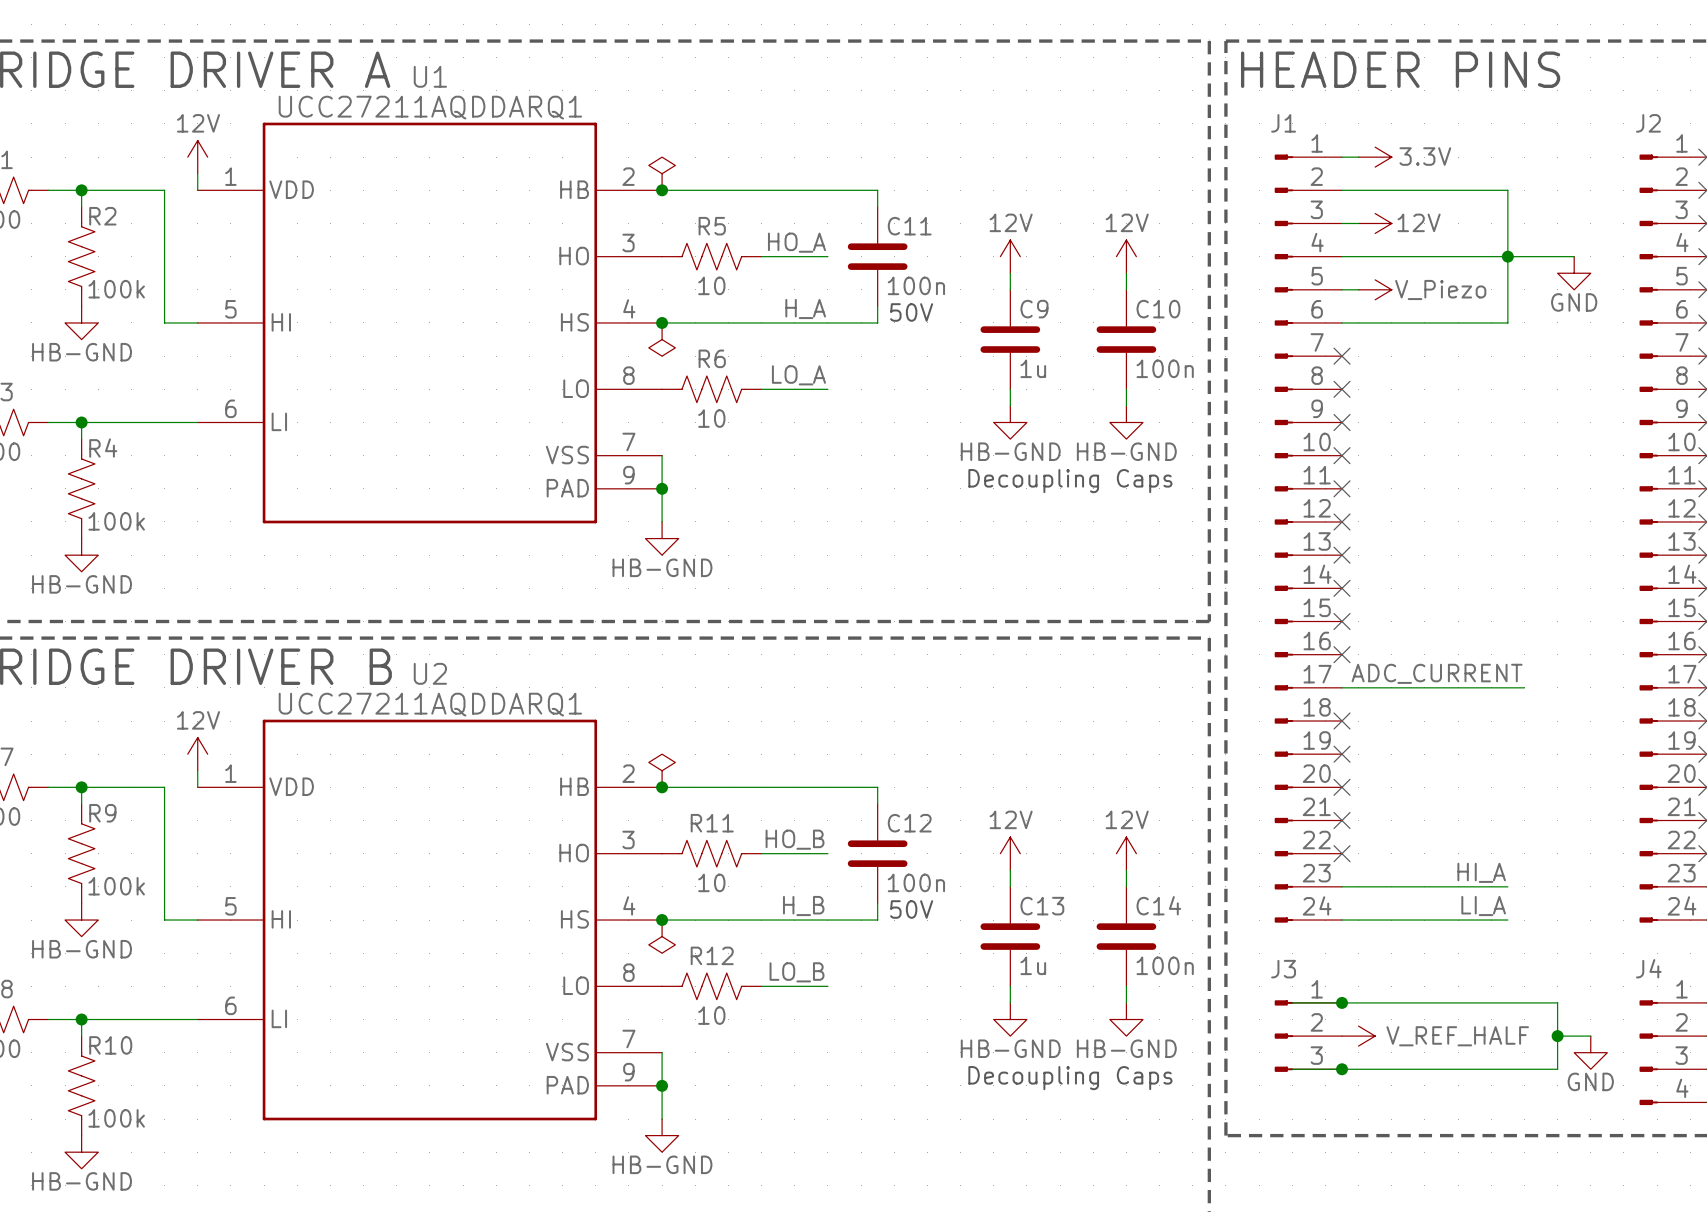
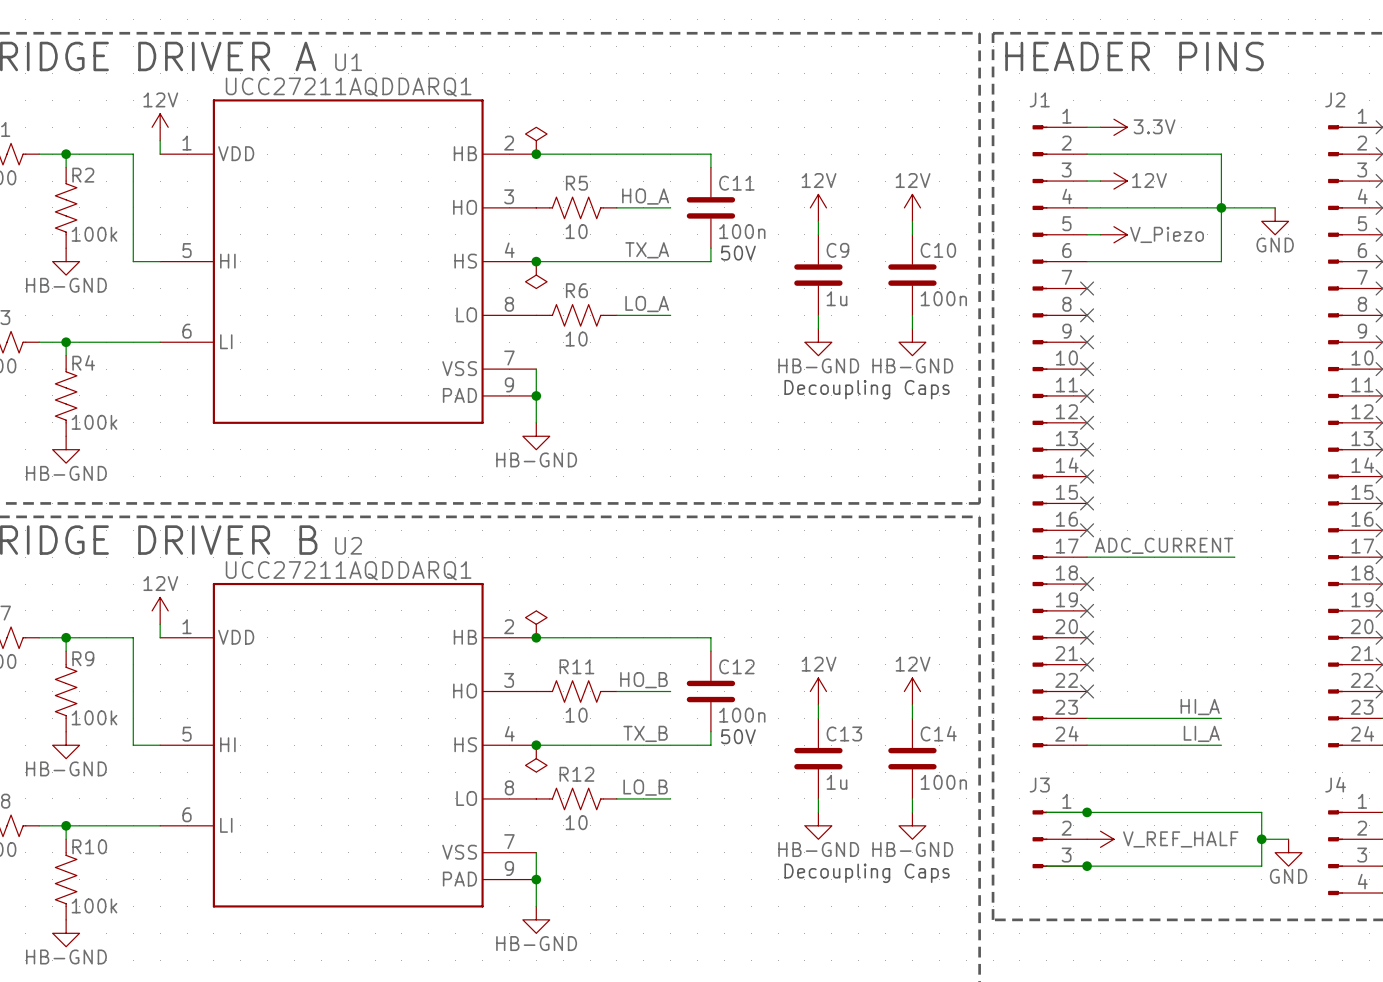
label: H_A (805, 308) -> TX_A (647, 250)
label: H_B (803, 906) -> TX_B (645, 733)

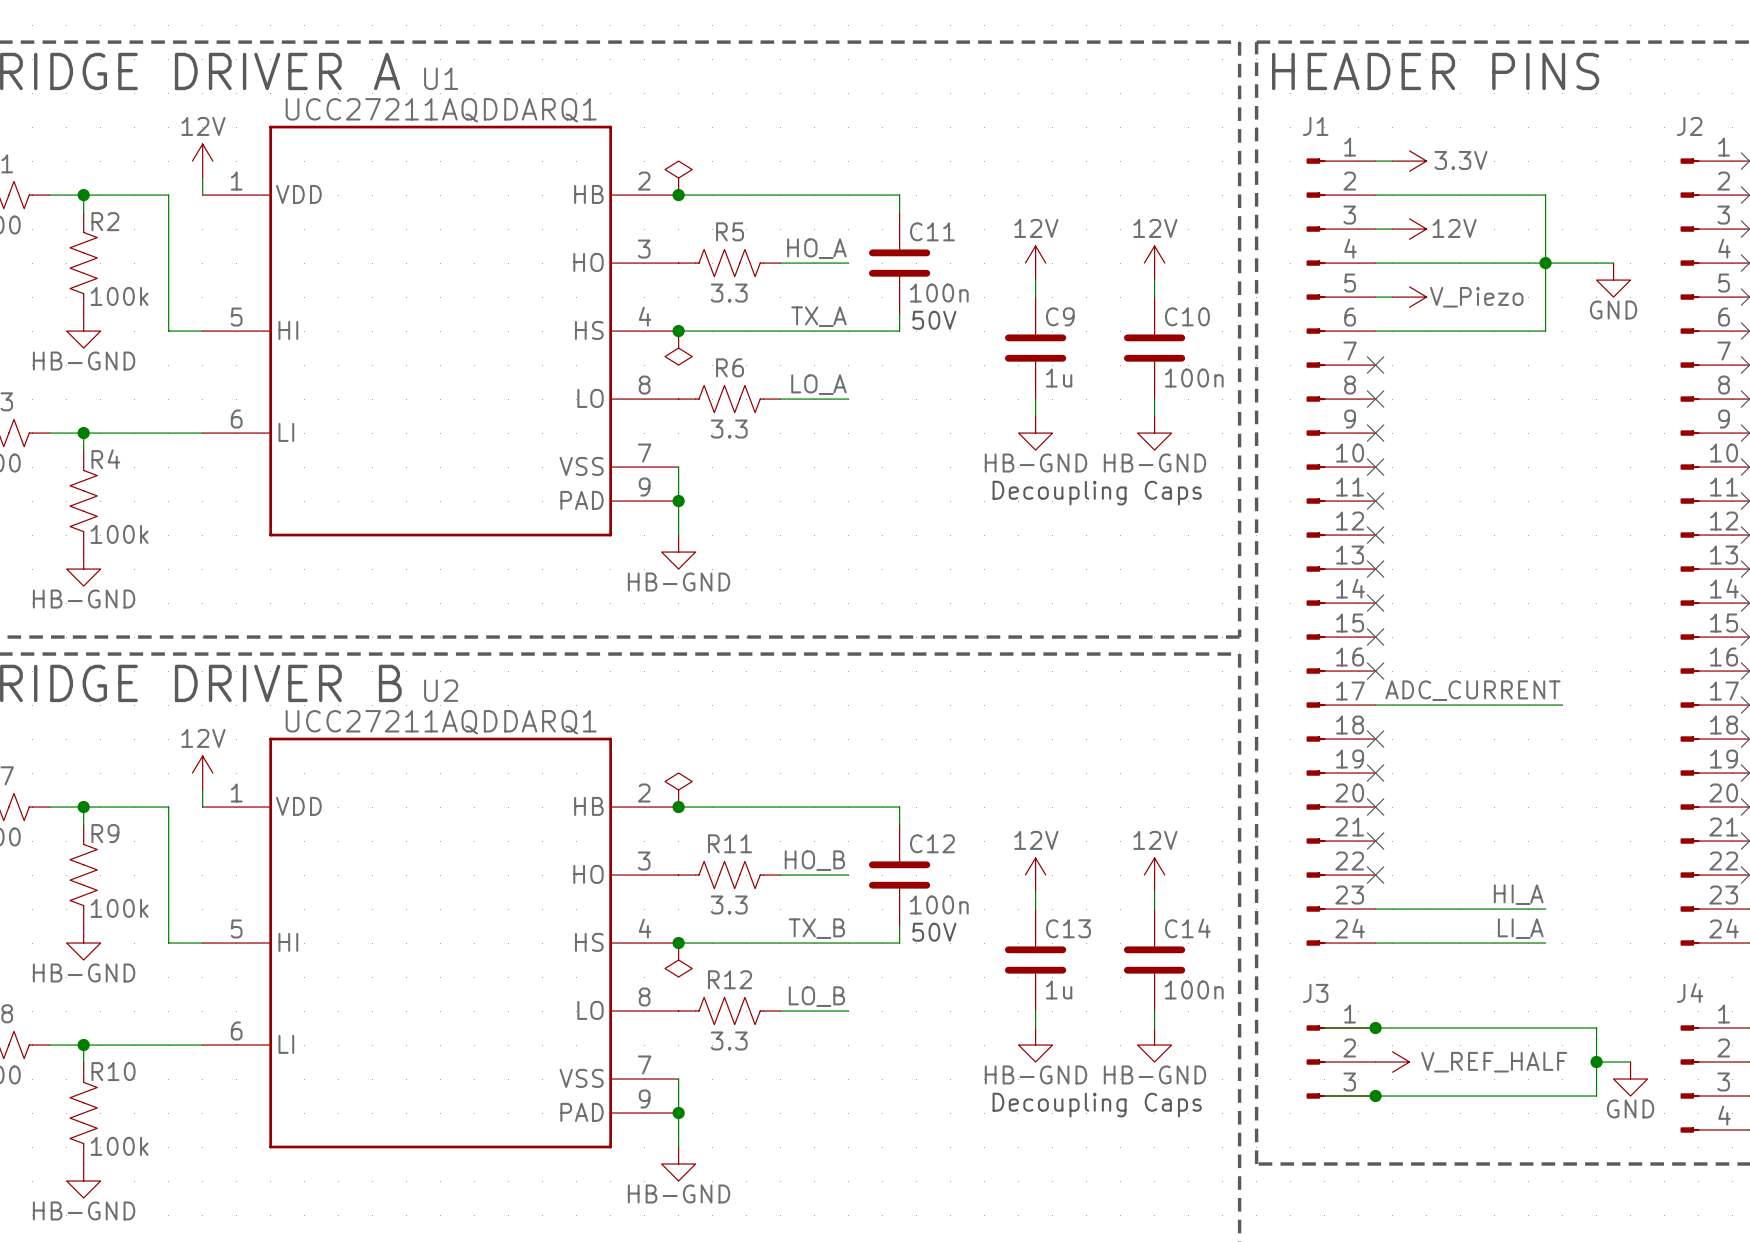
R5 value: 10 (576, 231) -> 3.3 (729, 293)
R6 value: 10 (576, 339) -> 3.3 (729, 429)
R11 value: 10 (576, 715) -> 3.3 (729, 904)
R12 value: 10 (576, 822) -> 3.3 (729, 1040)

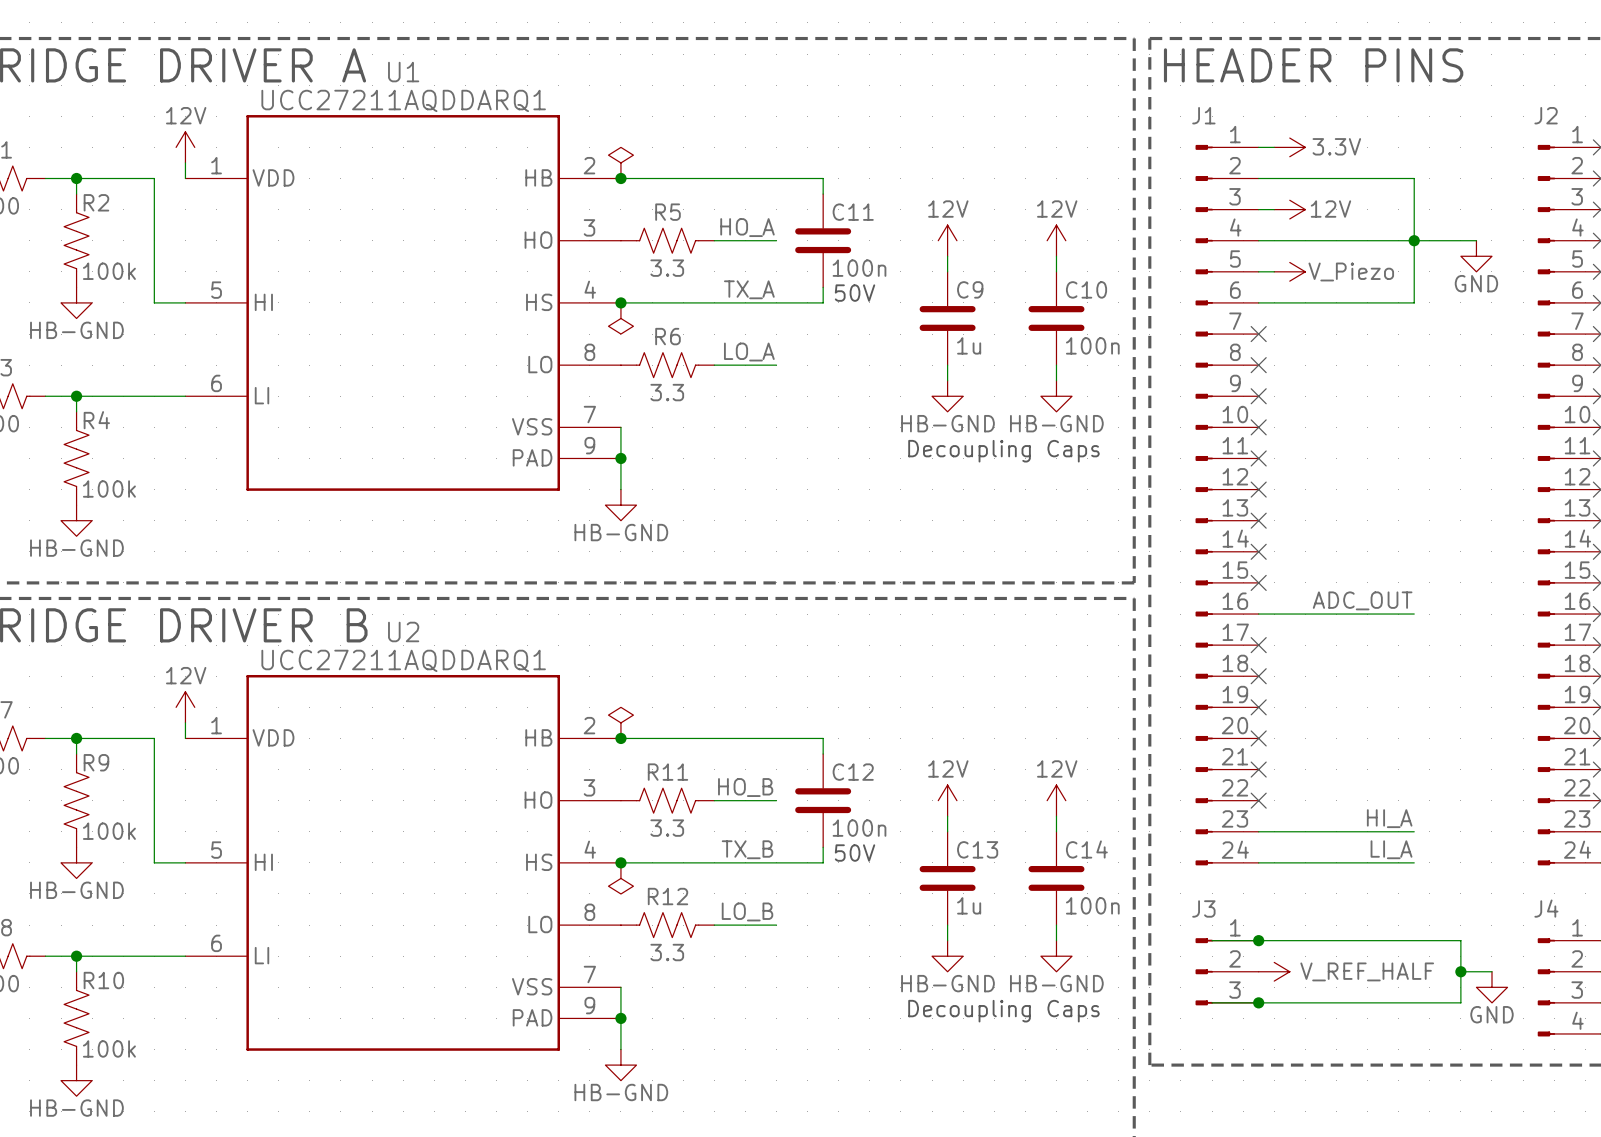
wire: none -> (1258, 614) (1414, 614)
no-connect mark position: (1375, 671) -> (1258, 645)
label: ADC_CURRENT (1472, 690) -> ADC_OUT (1362, 600)
wire: (1375, 705) (1562, 705) -> none

